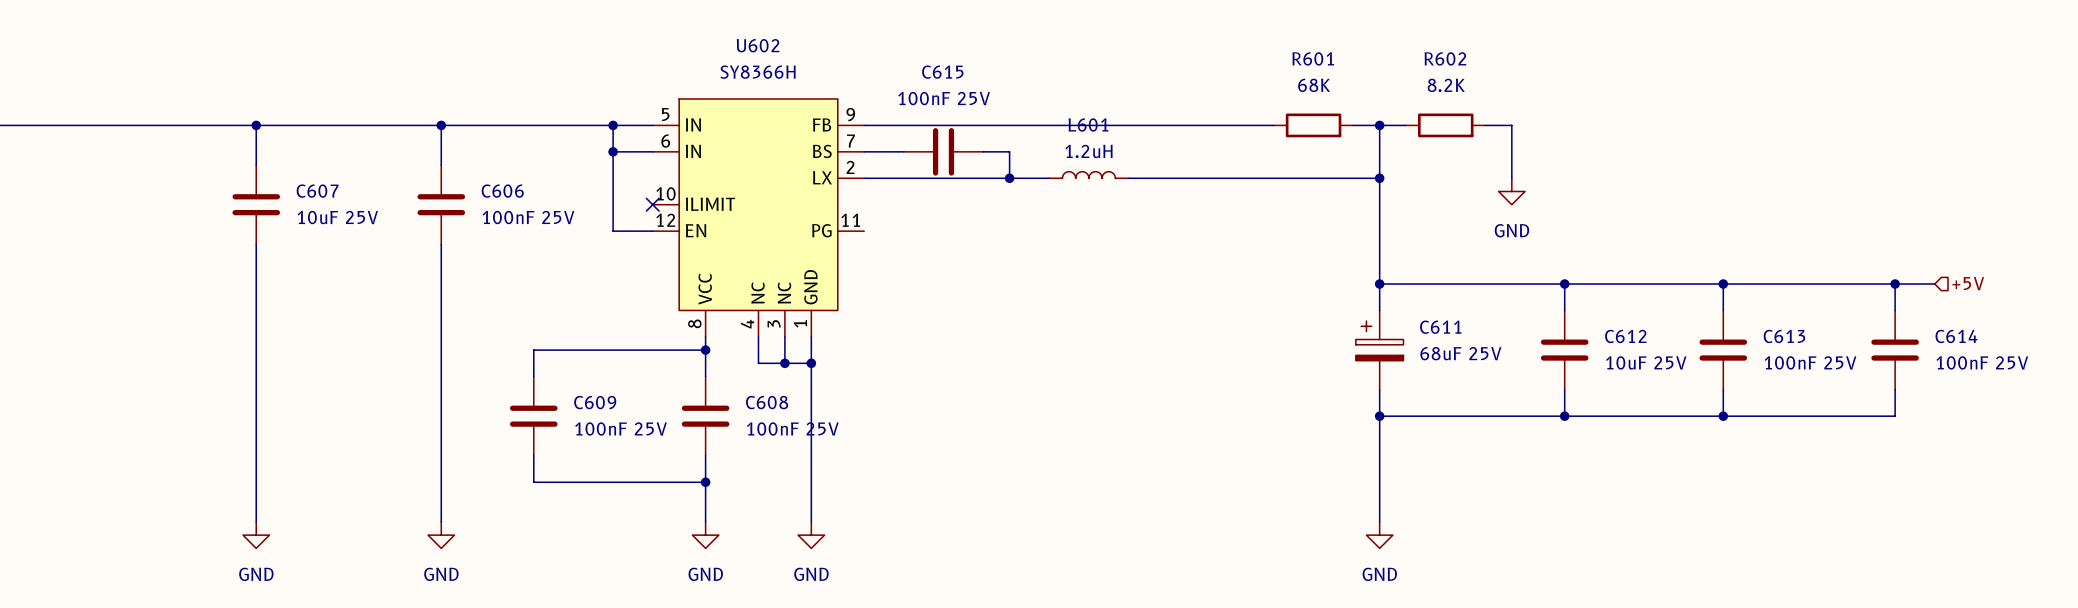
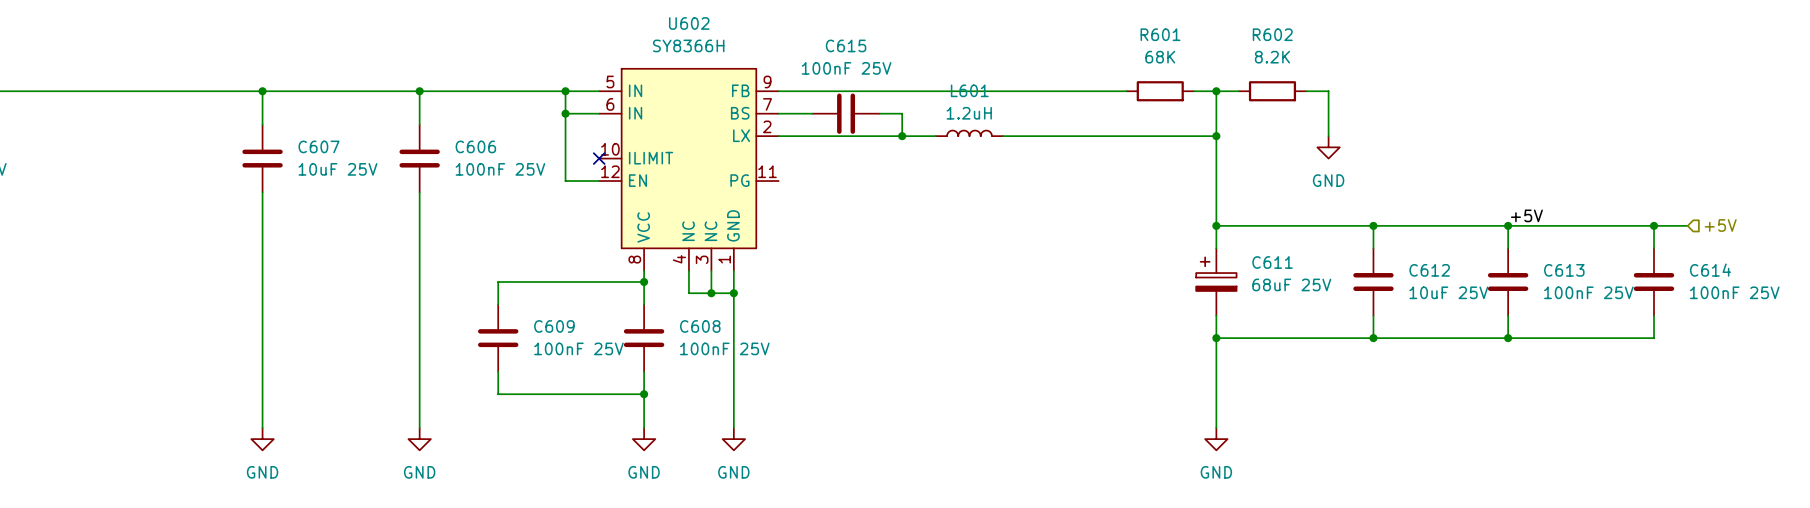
label: none -> +5V (1526, 215)

